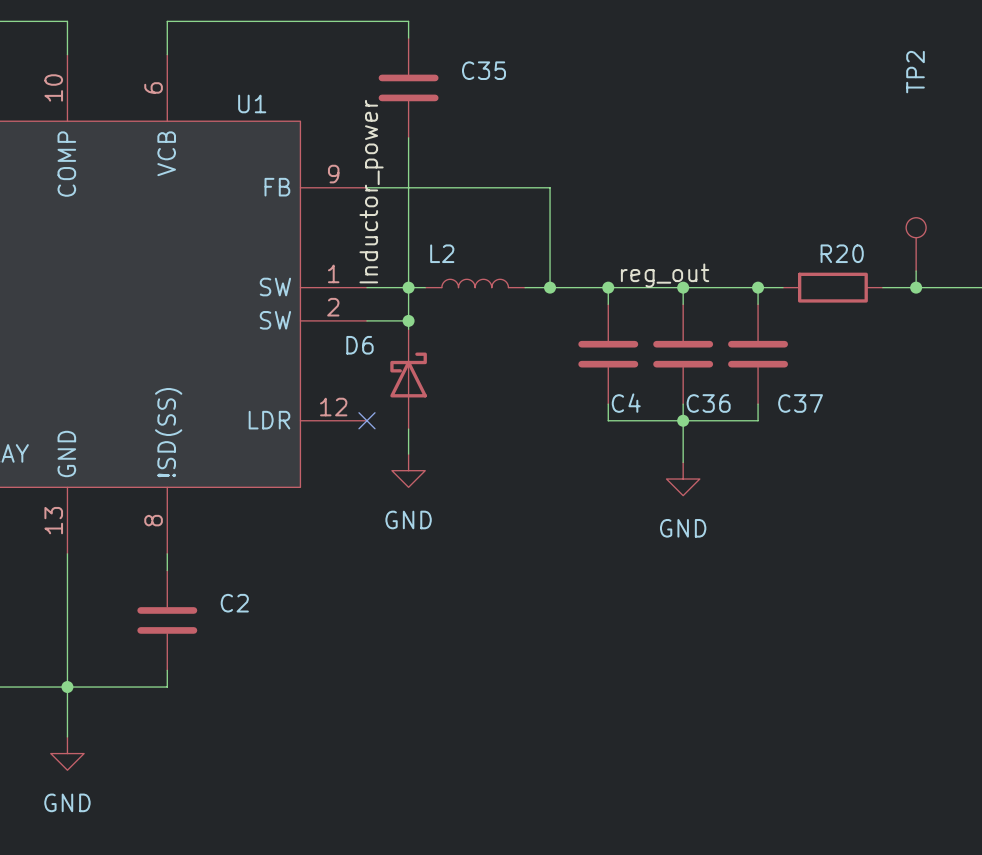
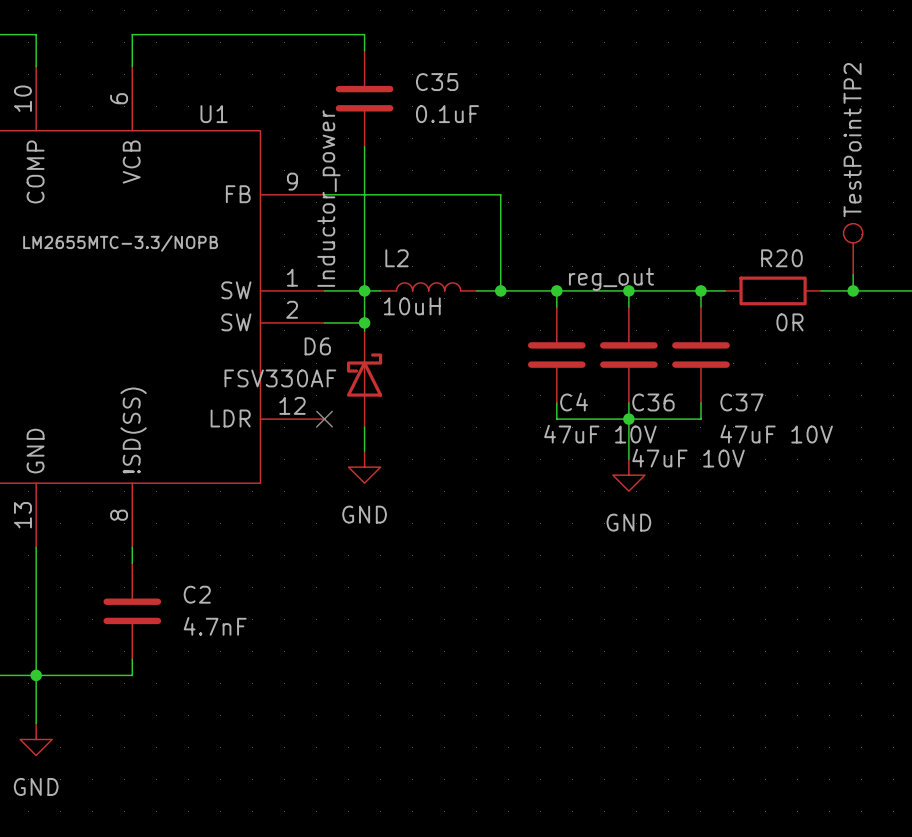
C35 value: none -> 0.1uF (447, 114)
TP2 value: none -> TestPoint (852, 162)
U1 value: none -> LM2655MTC-3.3/NOPB (120, 243)
L2 value: none -> 10uH (412, 306)
R20 value: none -> 0R (789, 322)
D6 value: none -> FSV330AF (280, 378)
C4 value: none -> 47uF 10V (600, 434)
C37 value: none -> 47uF 10V (776, 434)
C36 value: none -> 47uF 10V (688, 458)
C2 value: none -> 4.7nF (215, 626)

